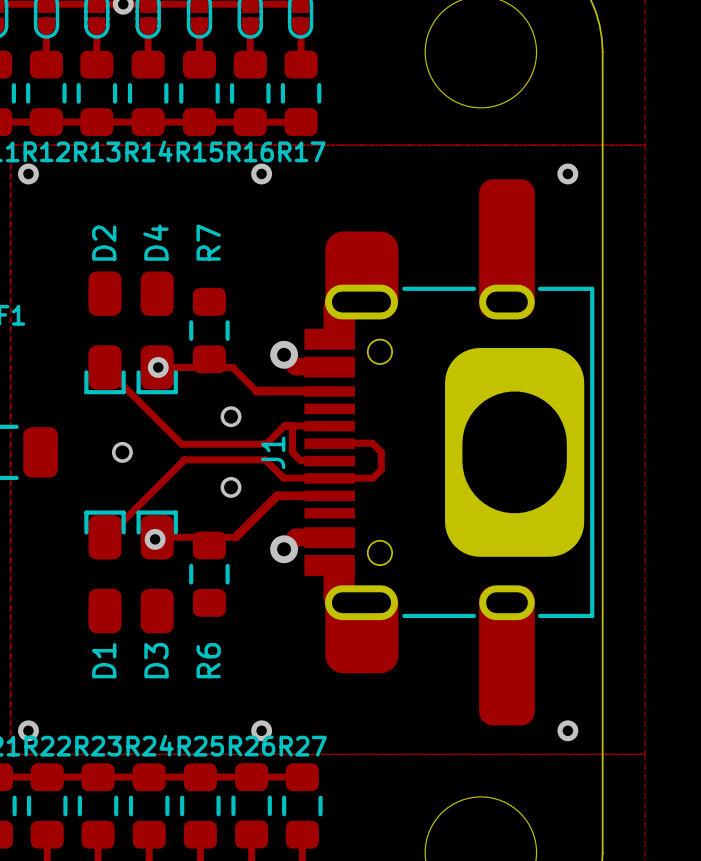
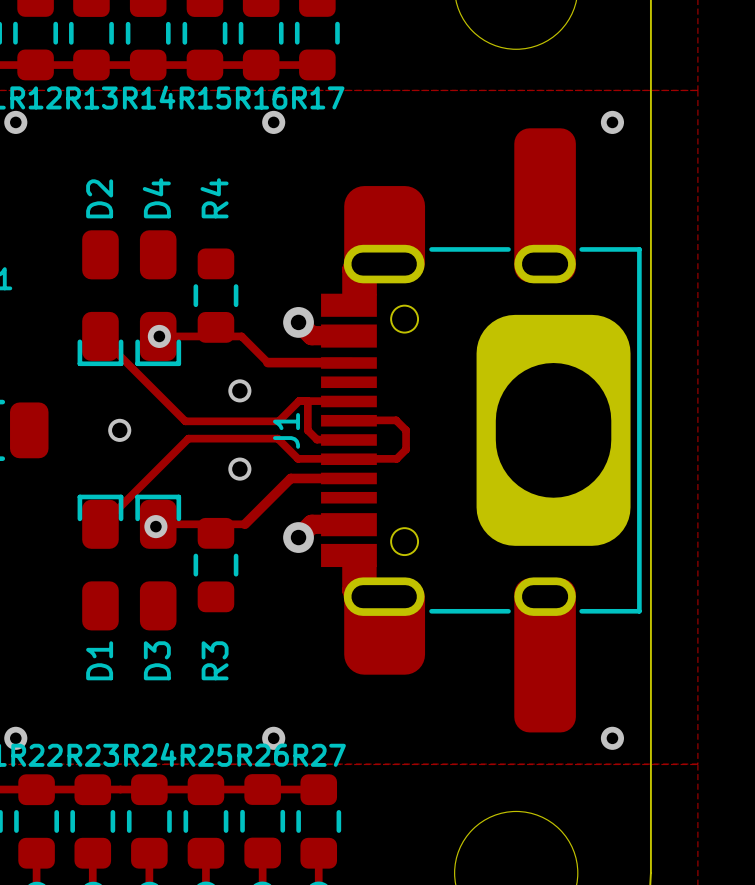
R7 name: R7 (208, 242) -> R4 (214, 198)
R6 name: R6 (208, 660) -> R3 (215, 660)

